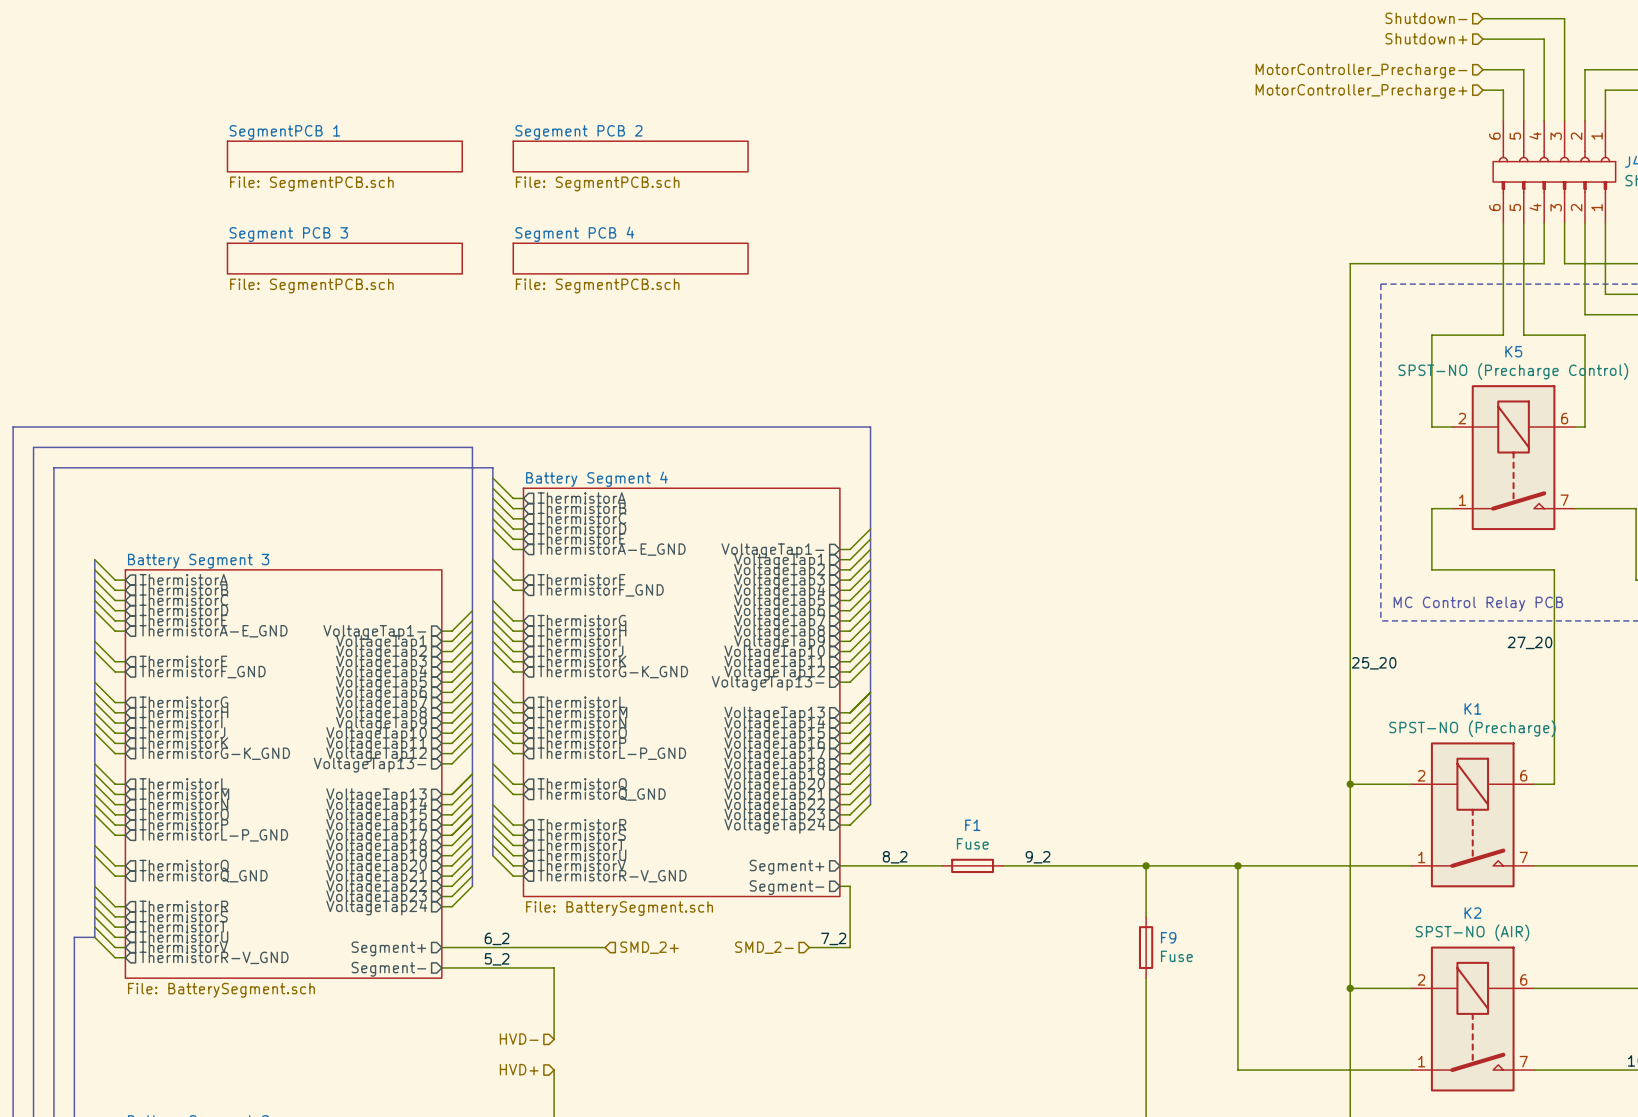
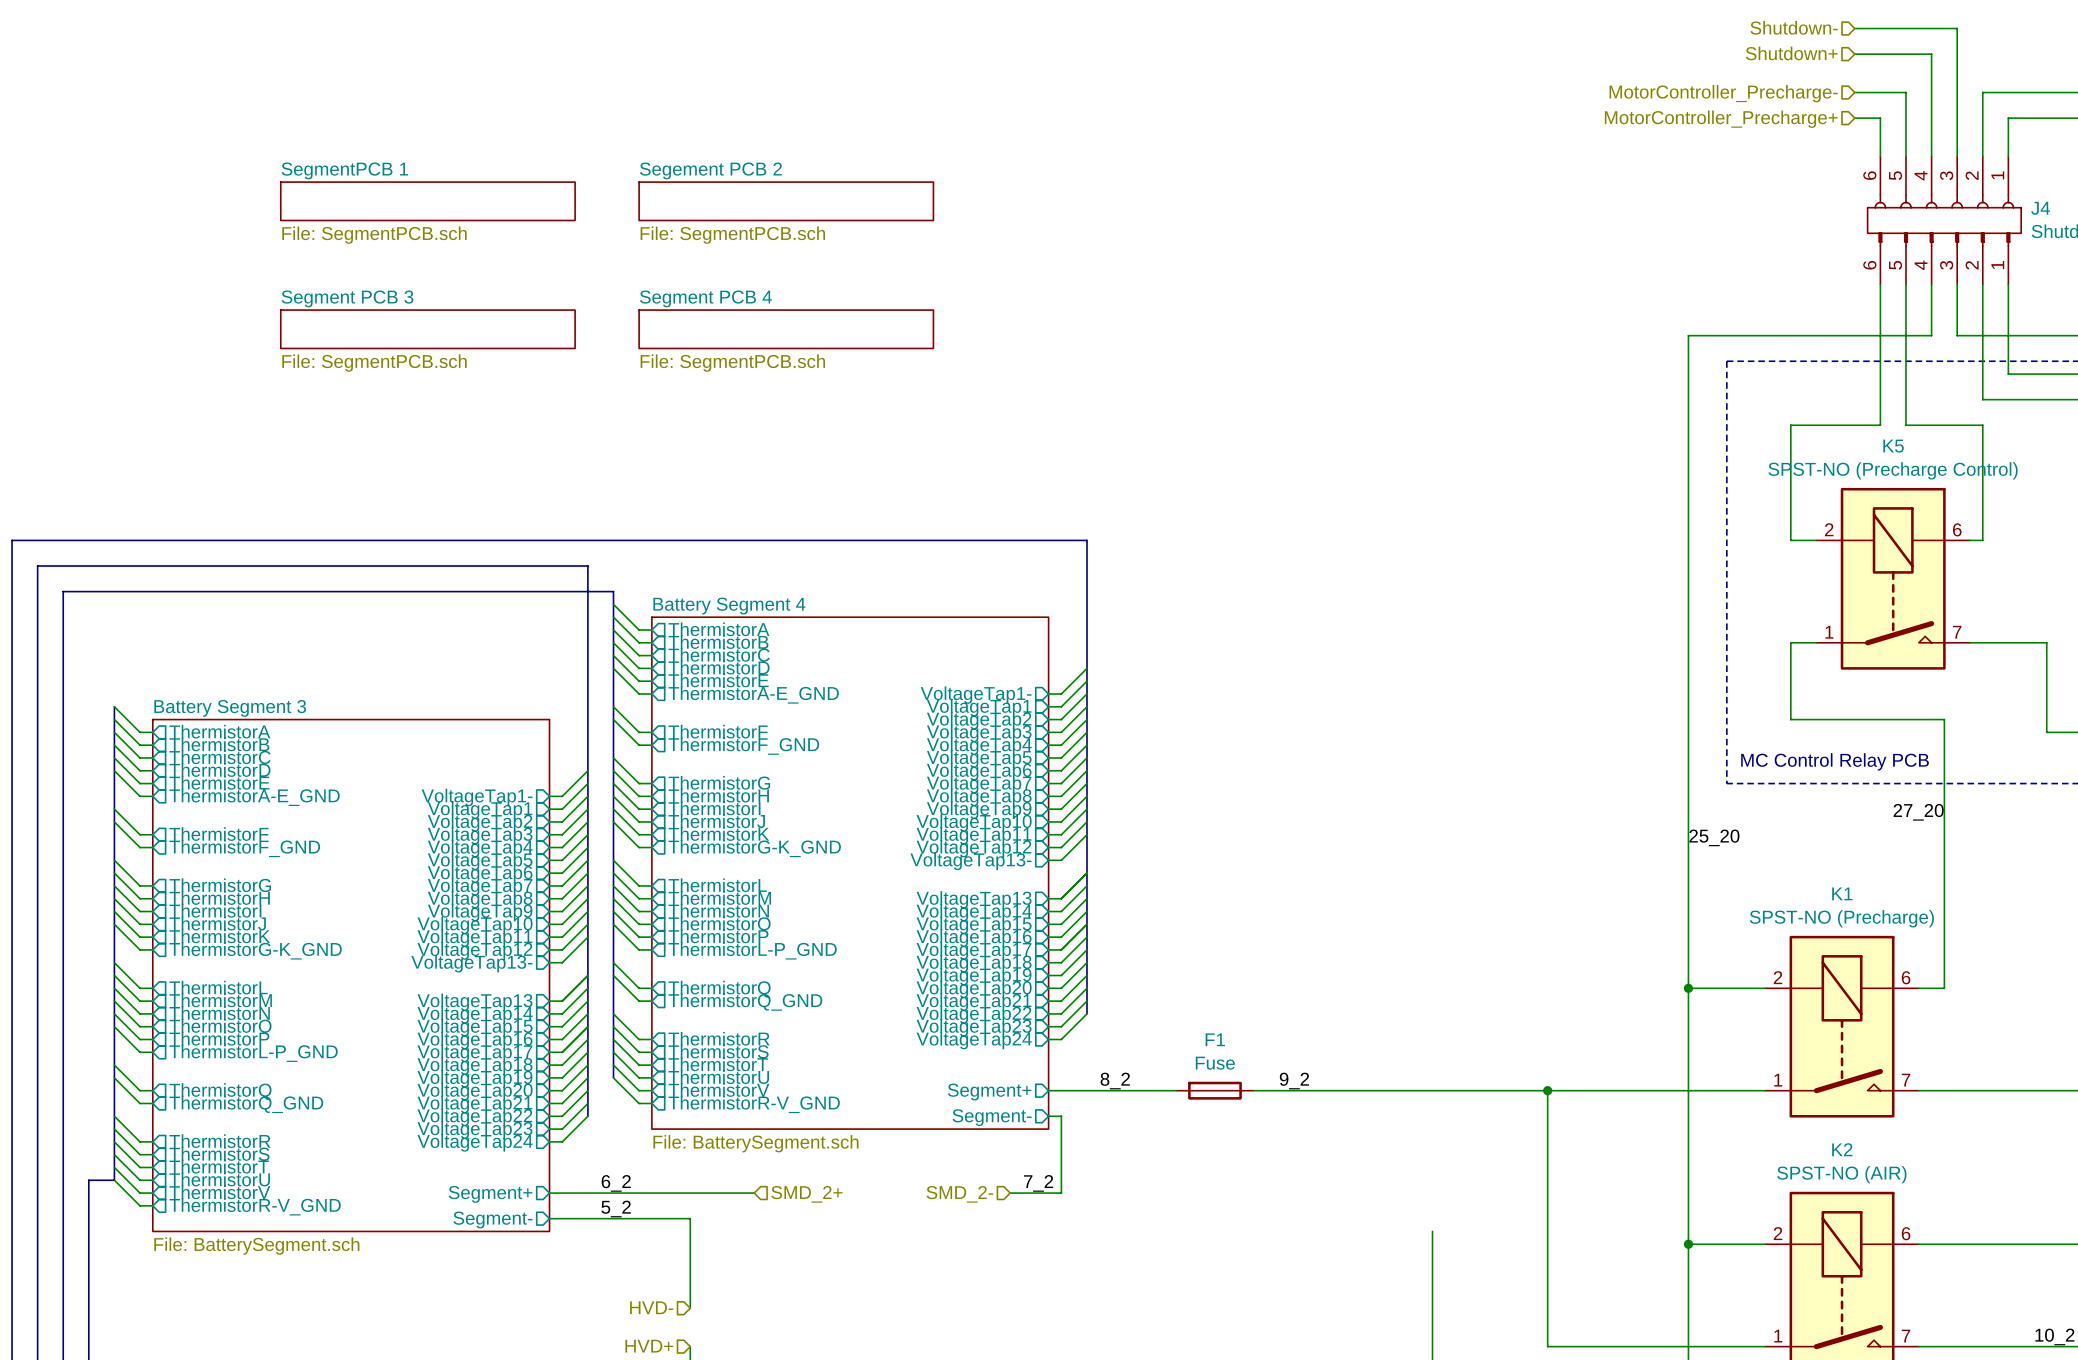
wire: (1146, 865) (1146, 916) -> none
junction: (1146, 865) -> none
F9: Fuse (1146, 947) -> none

